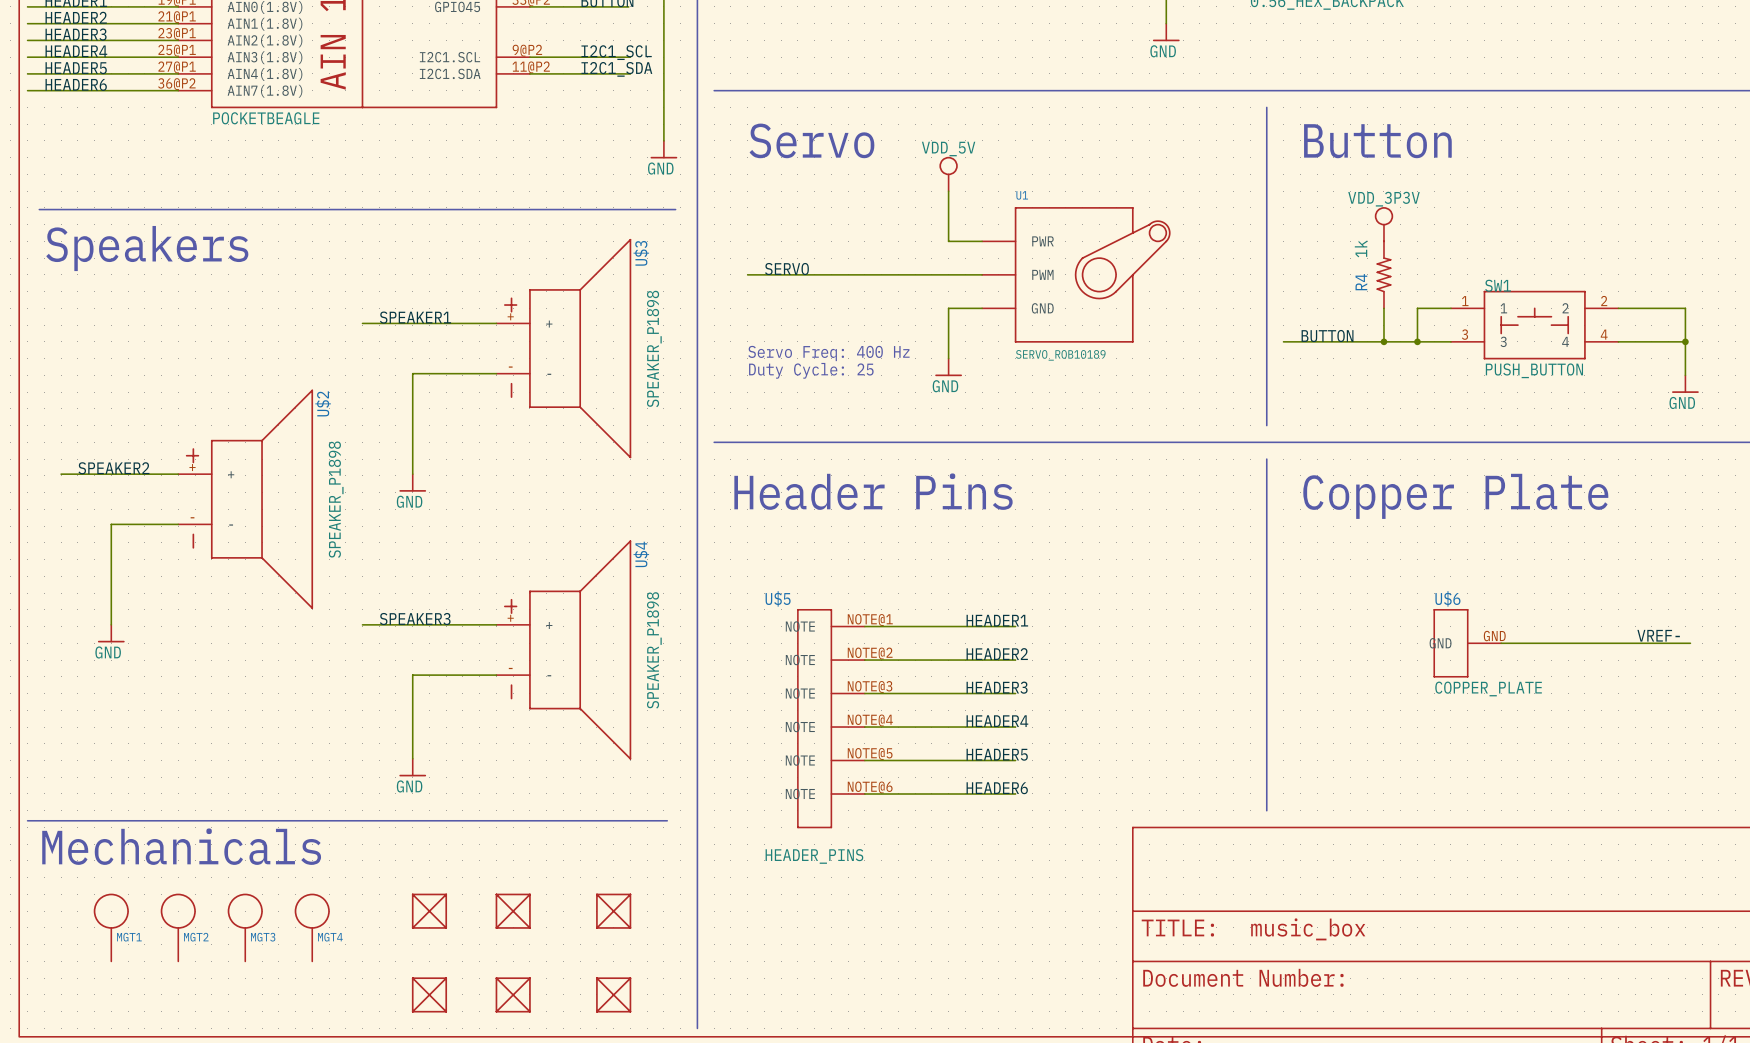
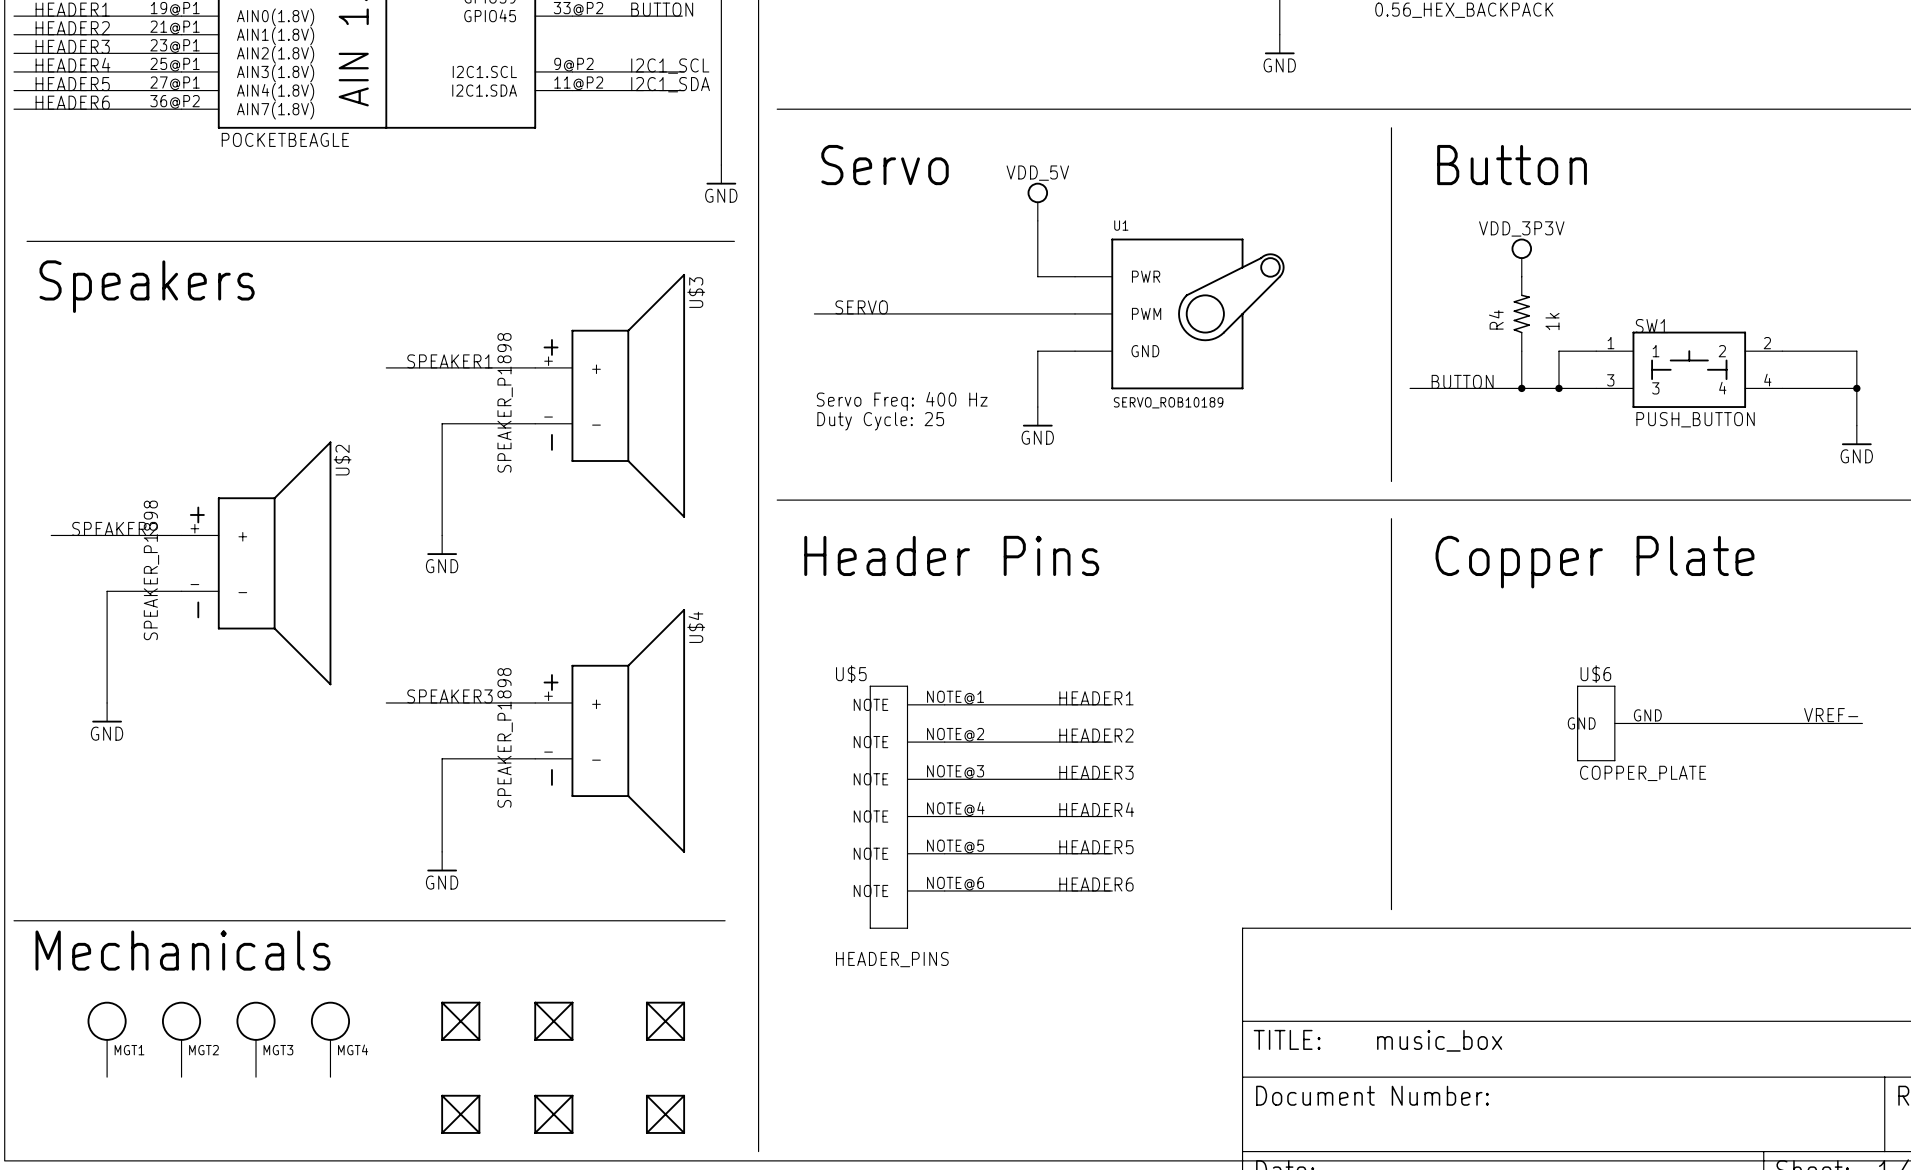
R4 value position: 1k (1361, 248) -> 1k (1552, 321)
U$3 value position: SPEAKER_P1898 (654, 348) -> SPEAKER_P1898 (505, 402)
U$2 value position: SPEAKER_P1898 (336, 499) -> SPEAKER_P1898 (151, 570)
U$4 value position: SPEAKER_P1898 (654, 650) -> SPEAKER_P1898 (505, 737)

